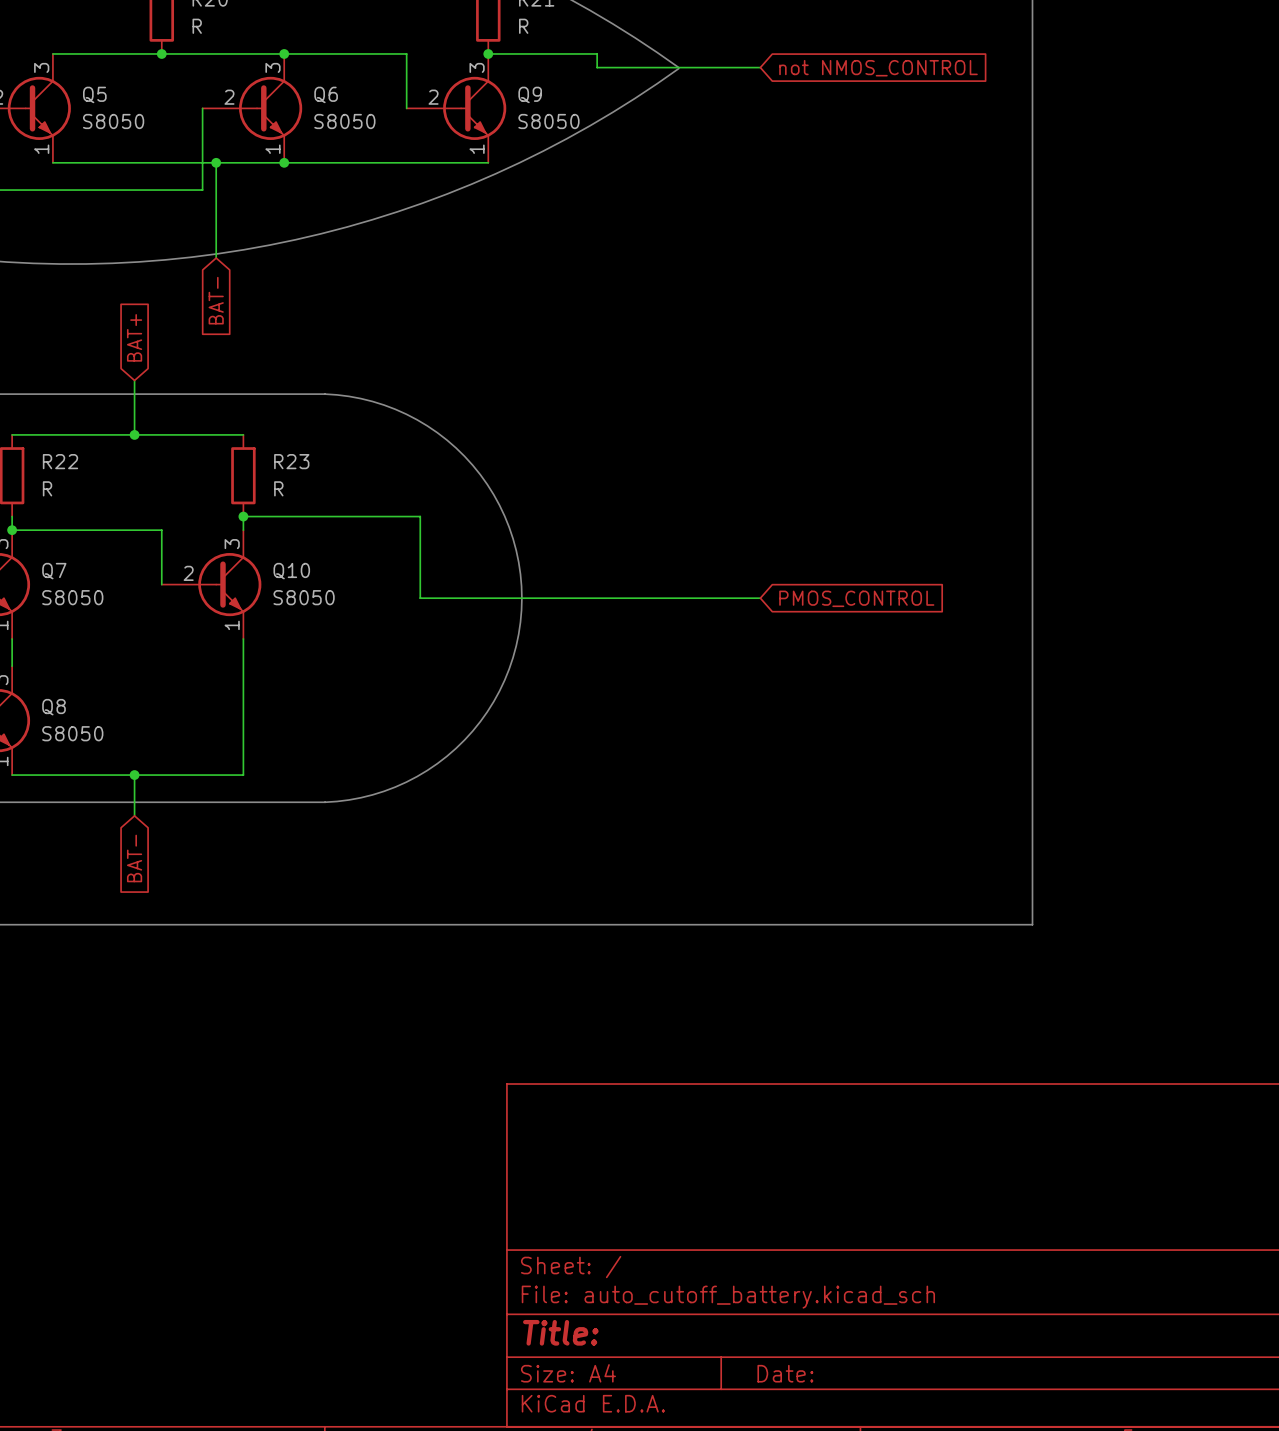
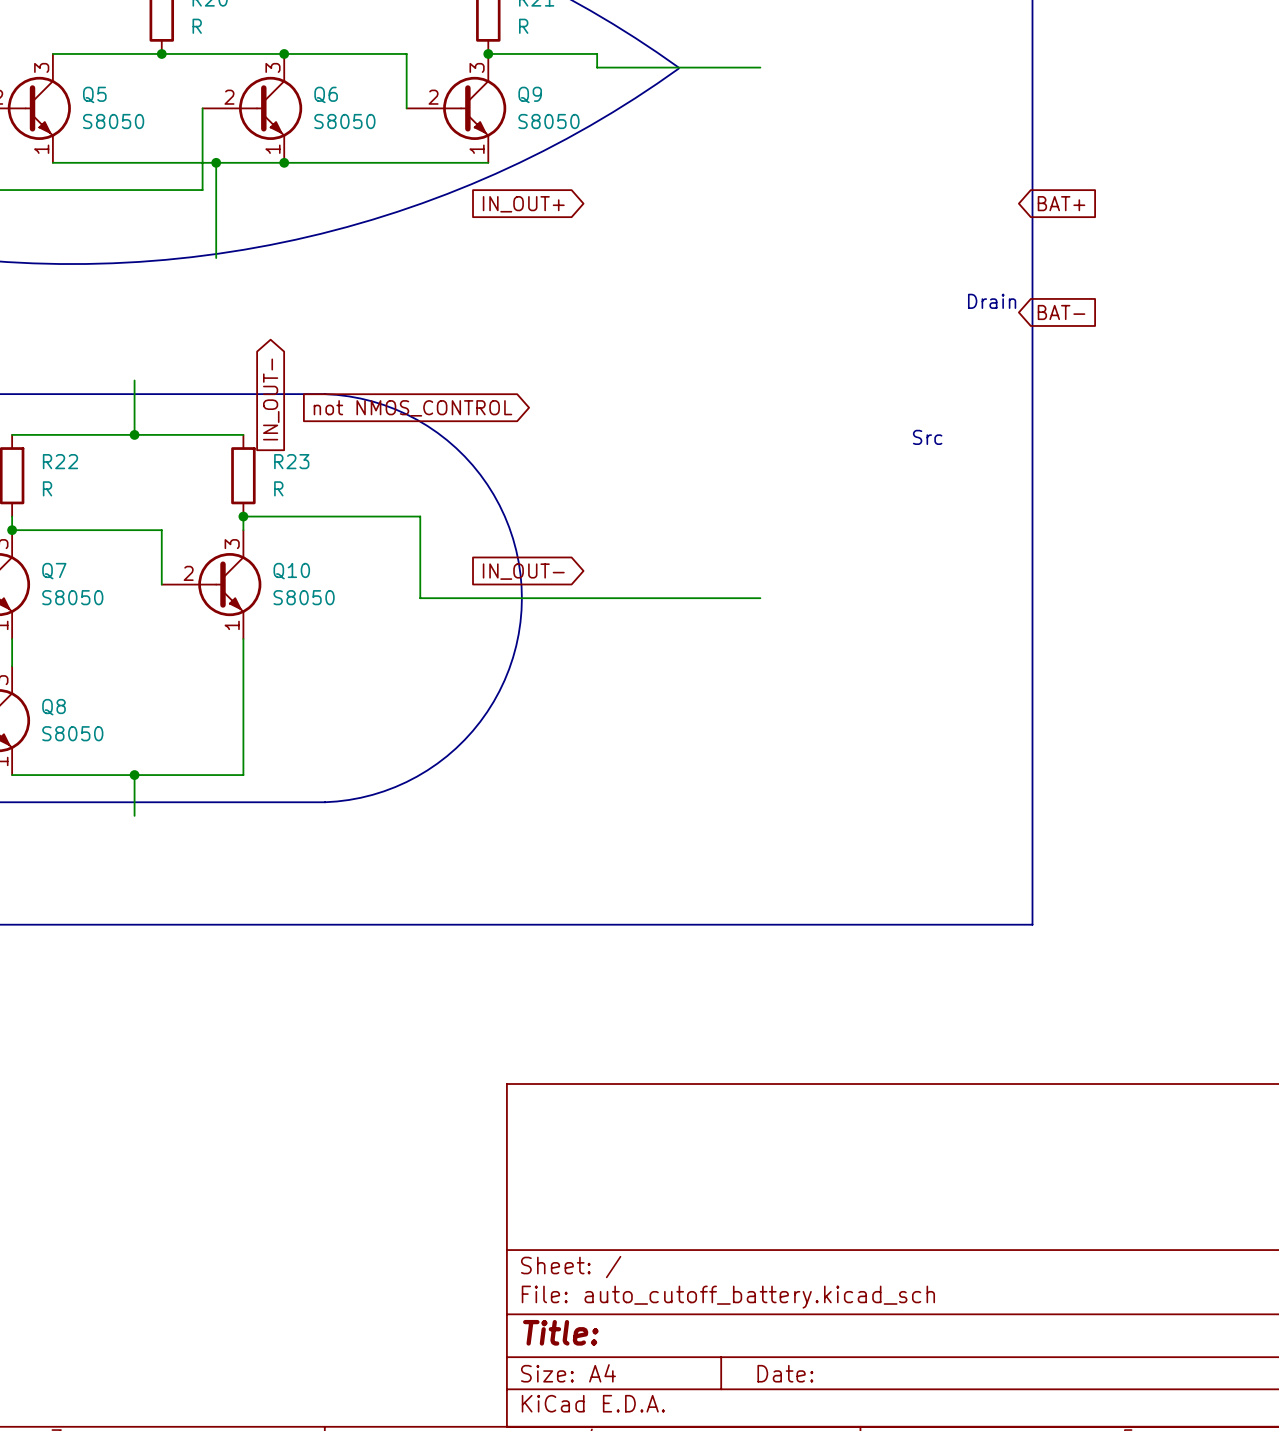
global label: not NMOS_CONTROL (878, 68) -> none
global label: none -> BAT+ (1061, 203)
global label: none -> IN_OUT+ (523, 204)
global label: BAT- (216, 300) -> none
text: none -> Drain (992, 301)
global label: none -> BAT- (1061, 312)
global label: BAT+ (134, 337) -> none
global label: none -> IN_OUT- (271, 399)
global label: none -> not NMOS_CONTROL (412, 408)
text: none -> Src (927, 437)
global label: none -> IN_OUT- (523, 571)
global label: PMOS_CONTROL (856, 598) -> none
global label: BAT- (134, 858) -> none

